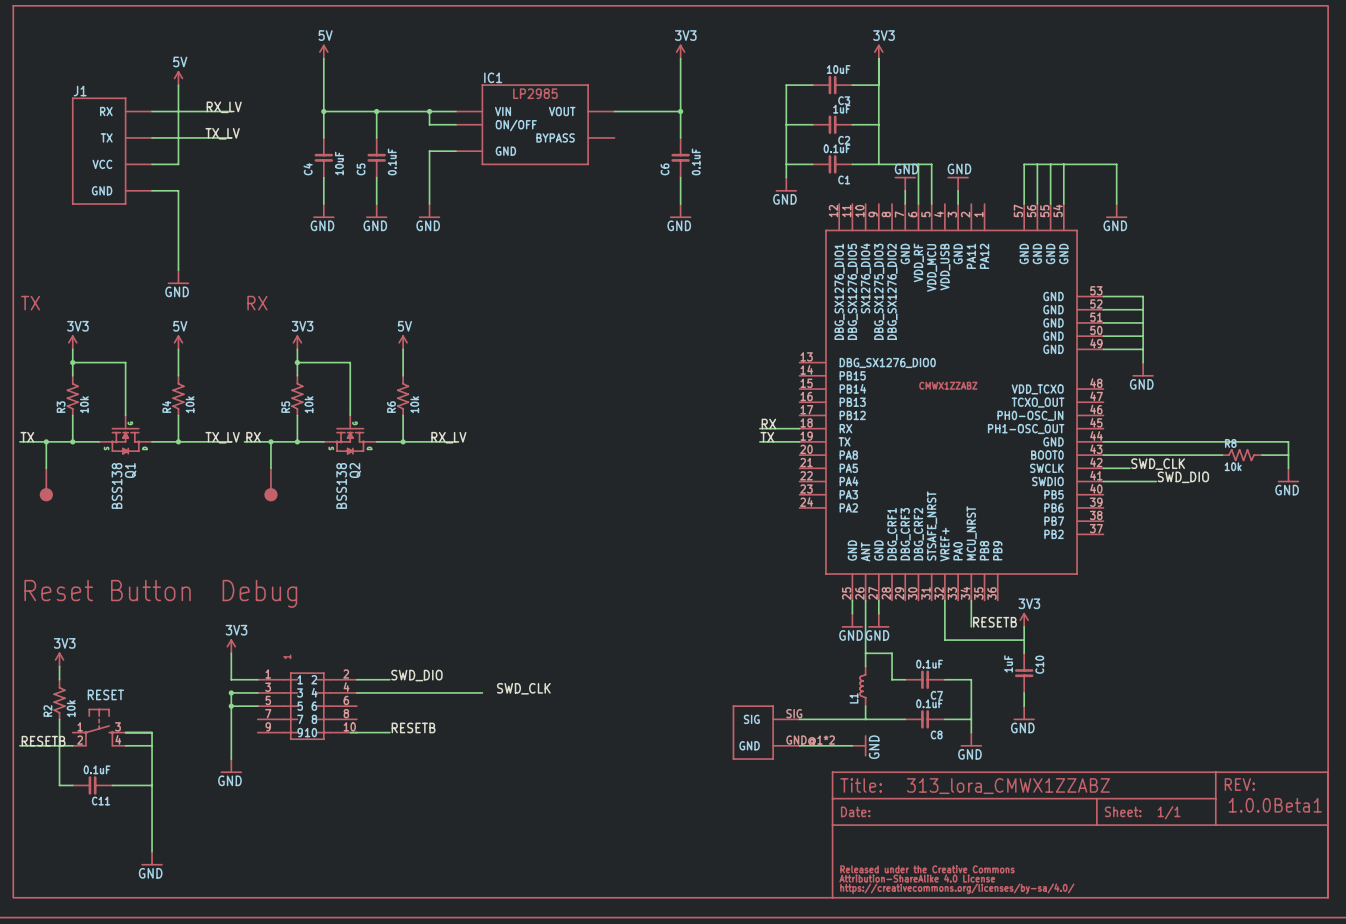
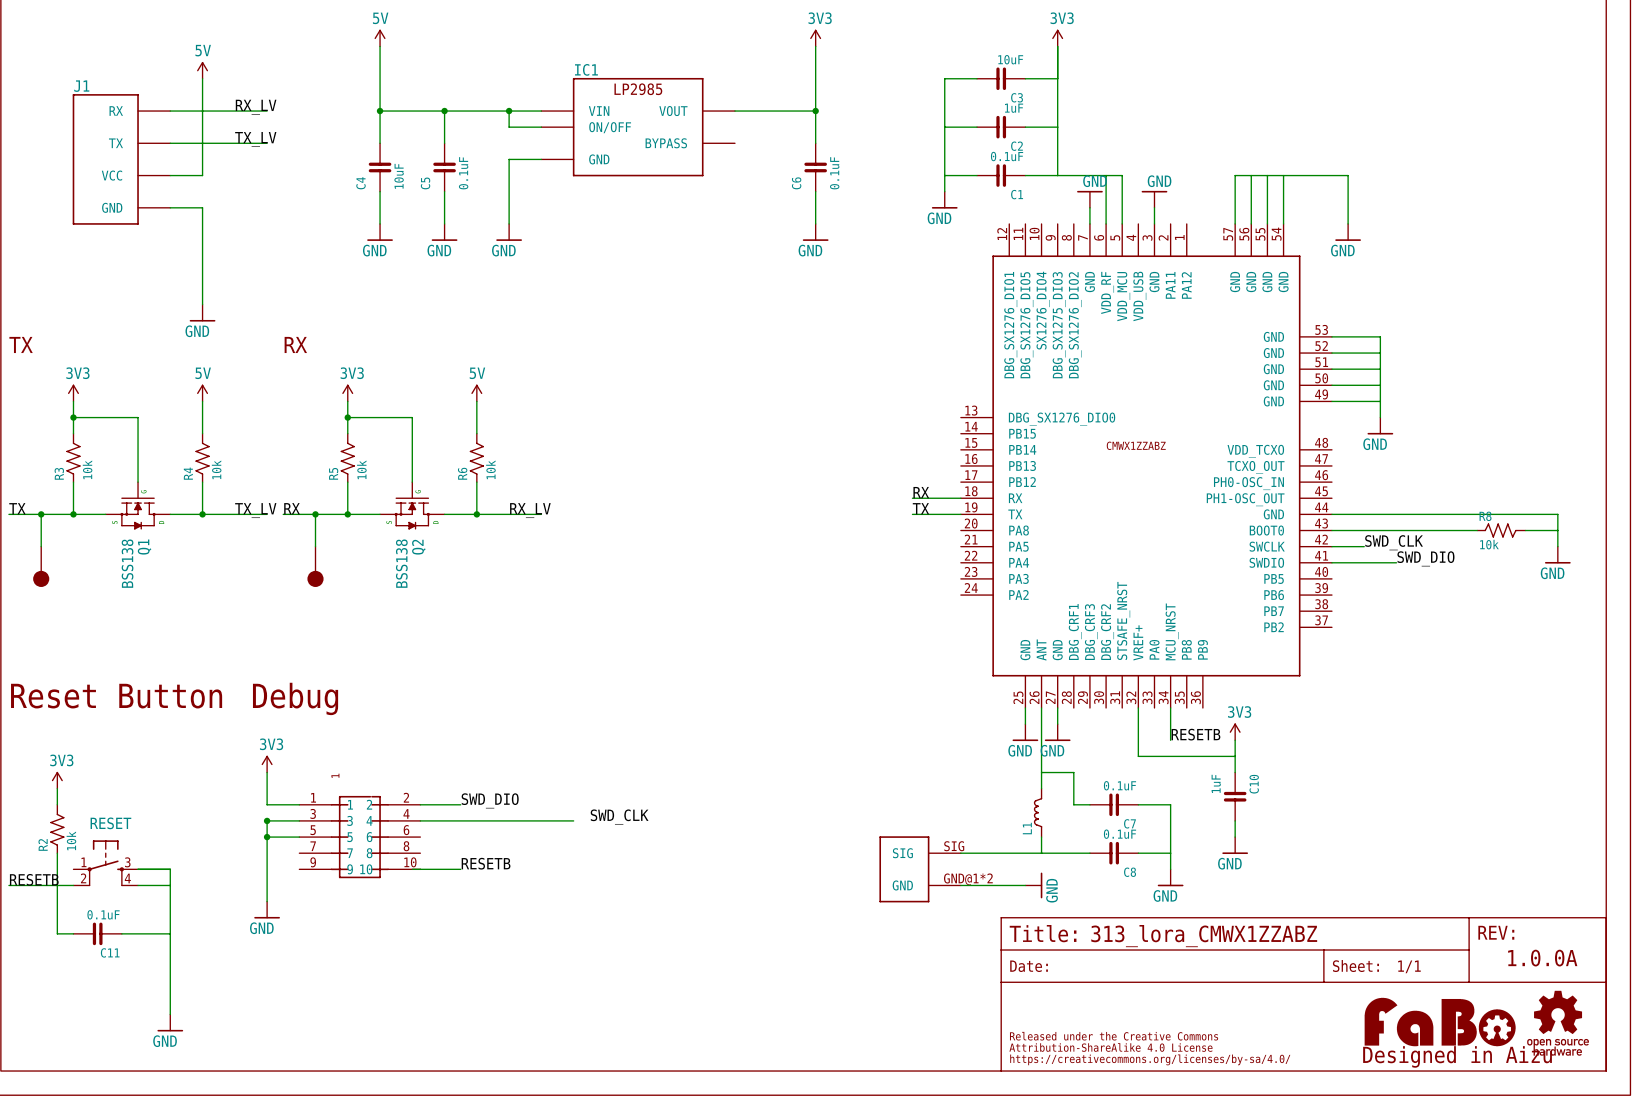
text: 1.0.0Beta1 (1275, 805) -> 1.0.0A (1542, 958)
part: none -> (1440, 1022)
part: none -> (1558, 1023)

